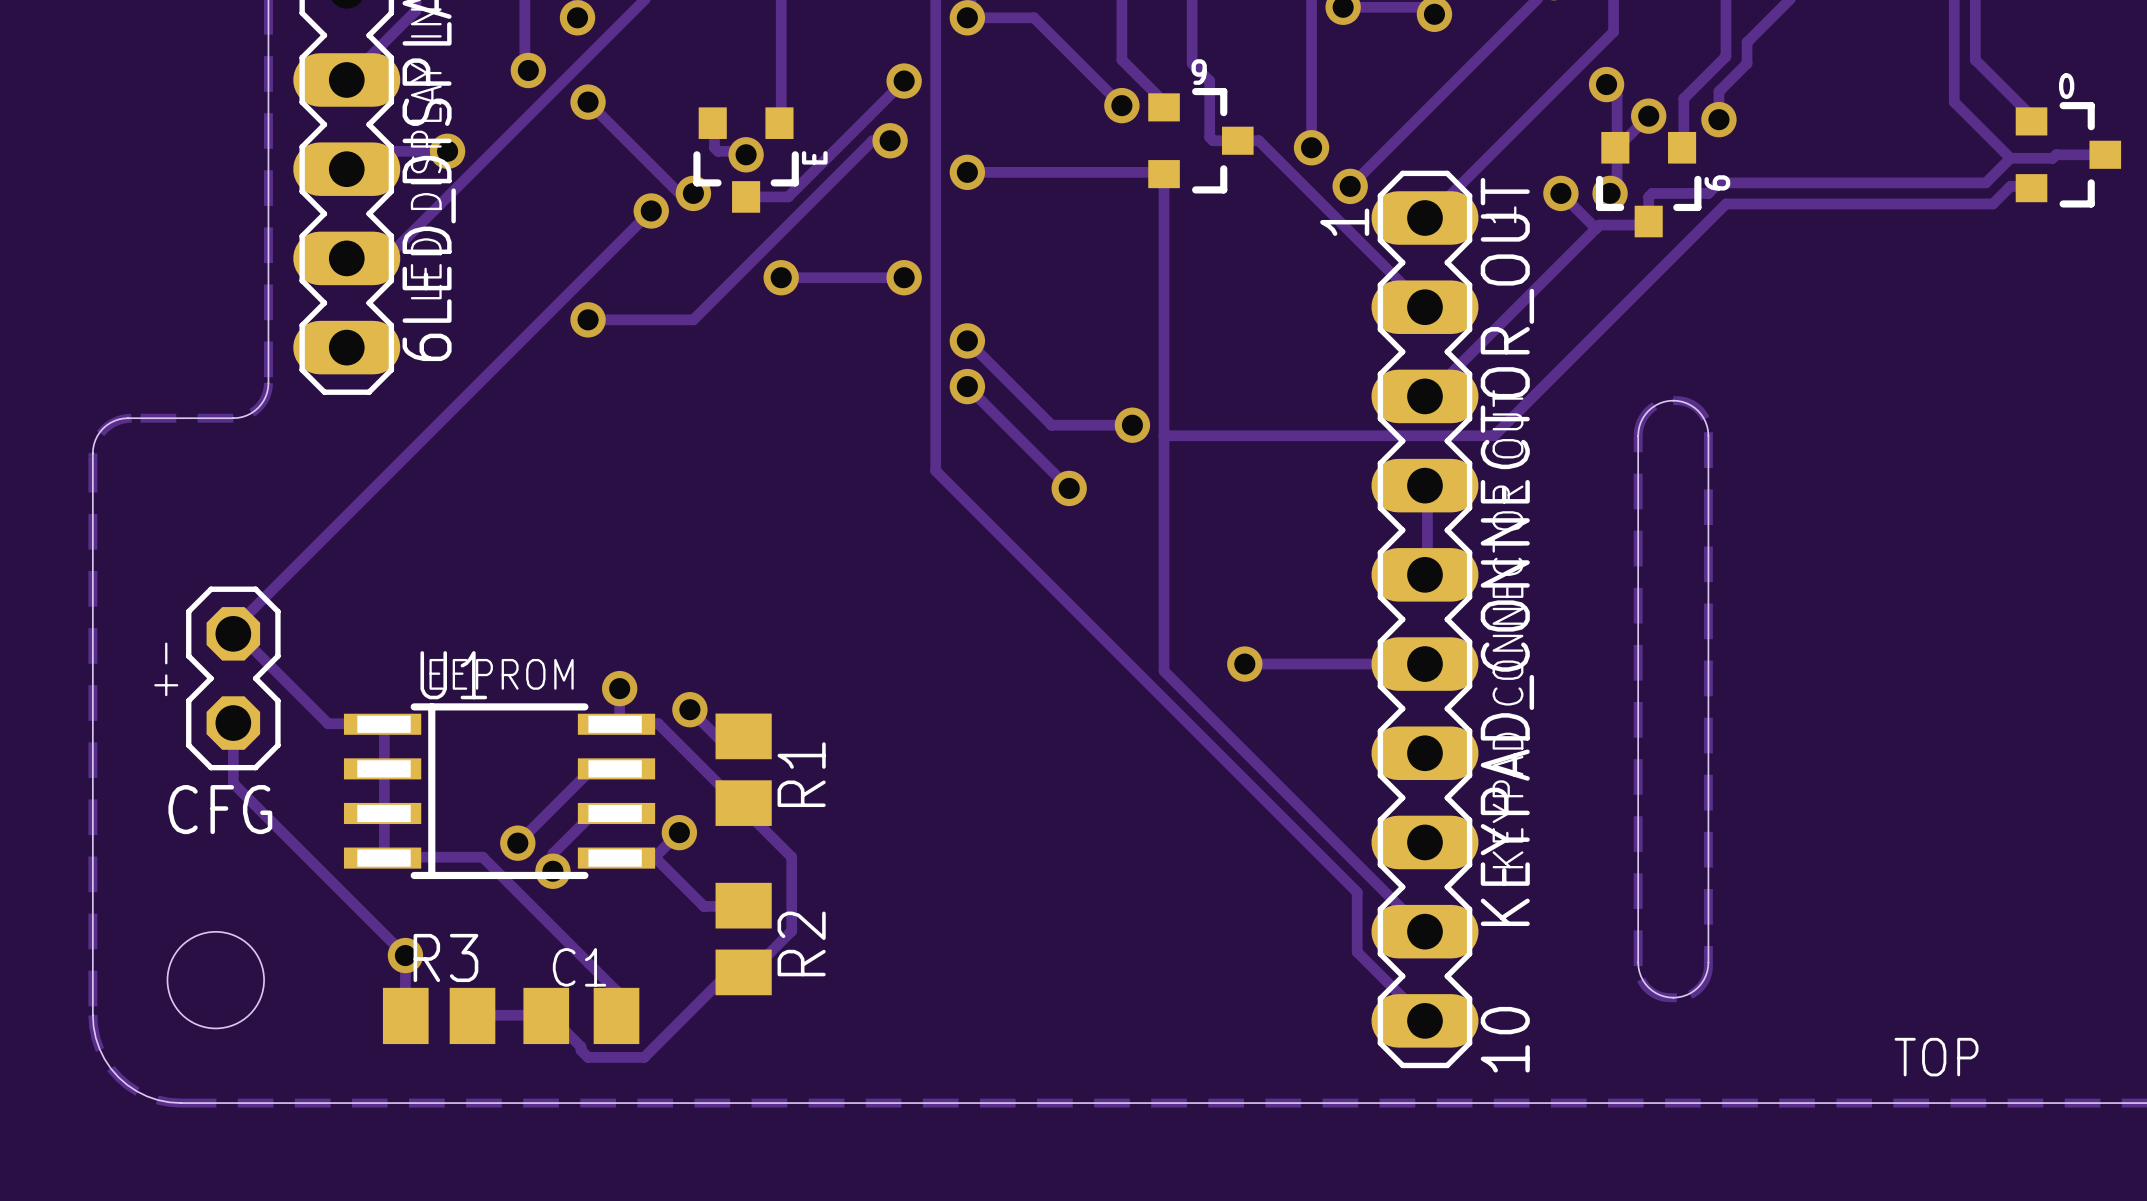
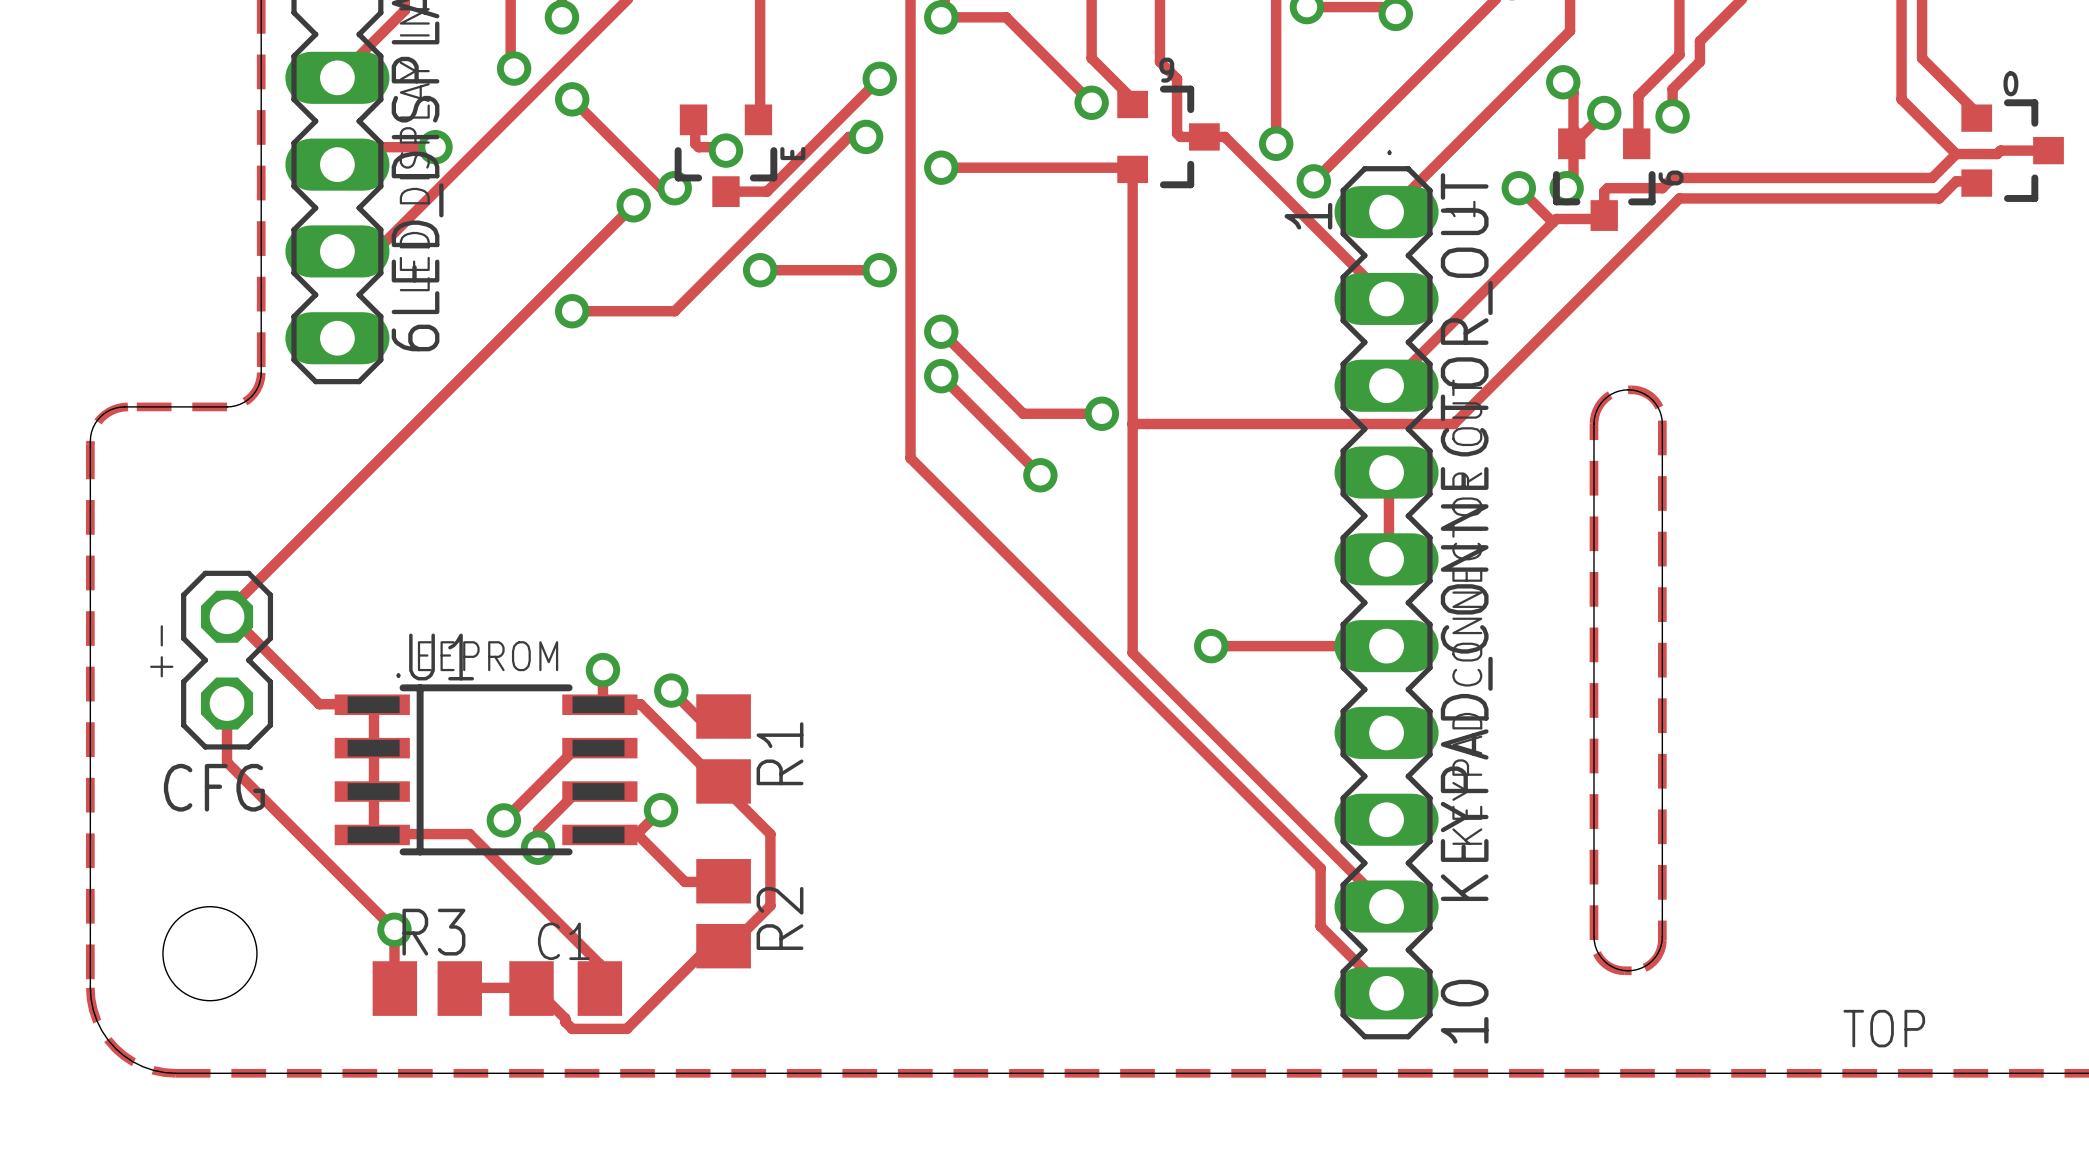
text: none -> . (1389, 152)
text: none -> . (398, 675)

